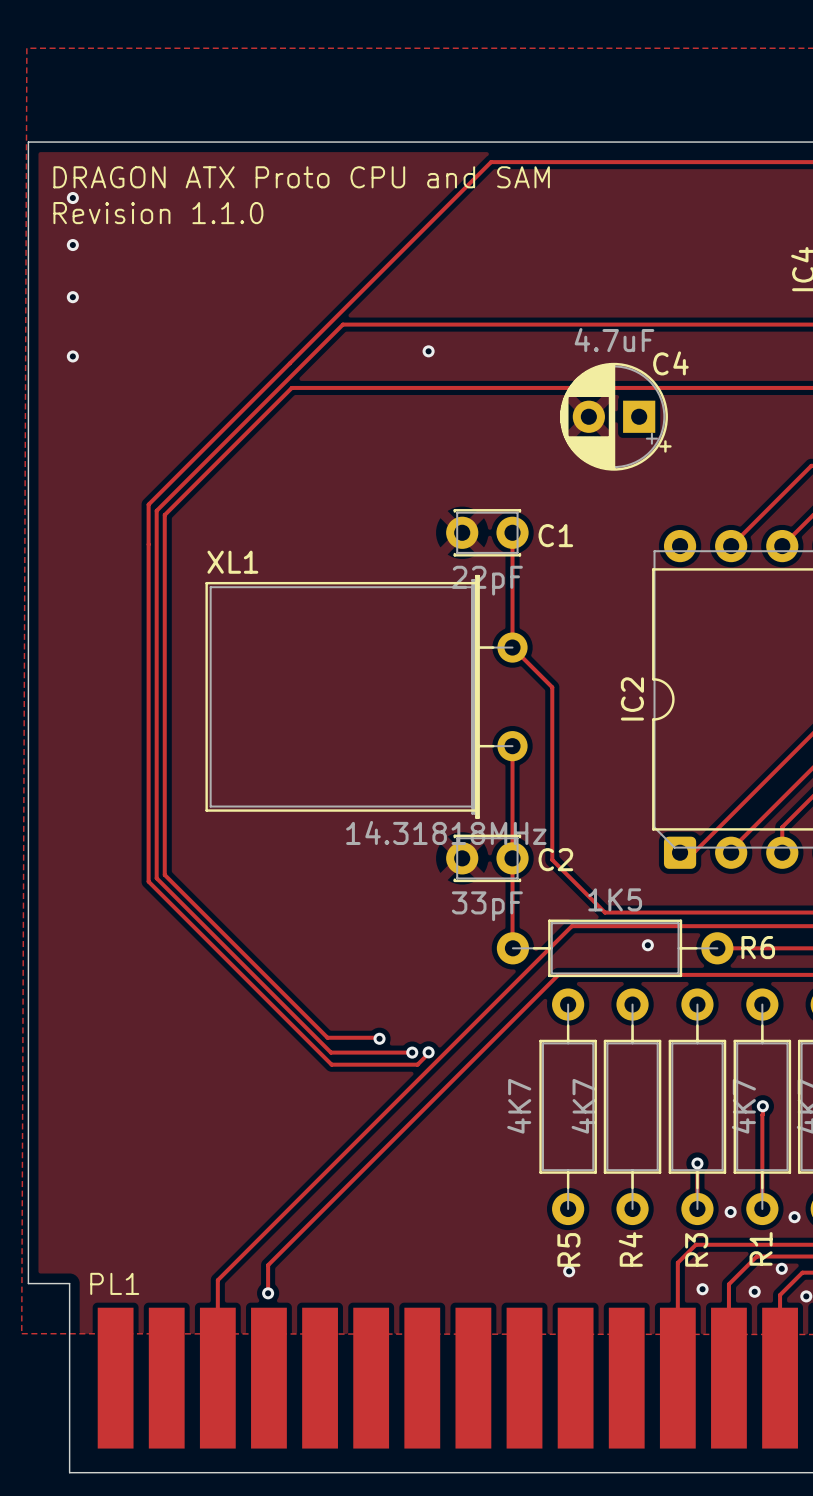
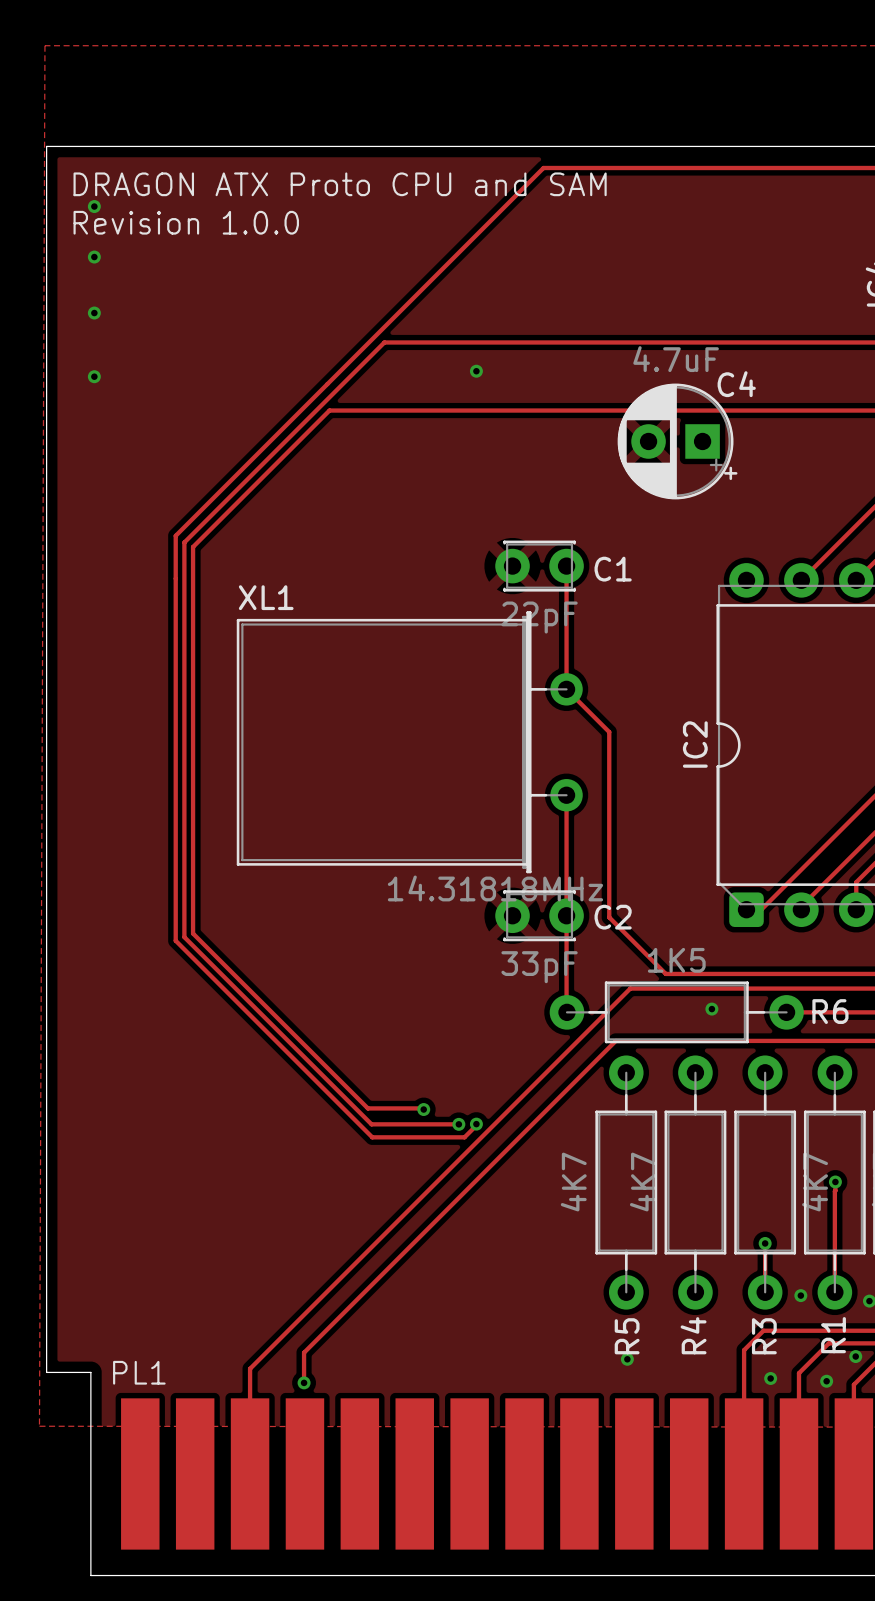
text: Revision 1.1.0 (158, 213) -> Revision 1.0.0 (186, 222)

